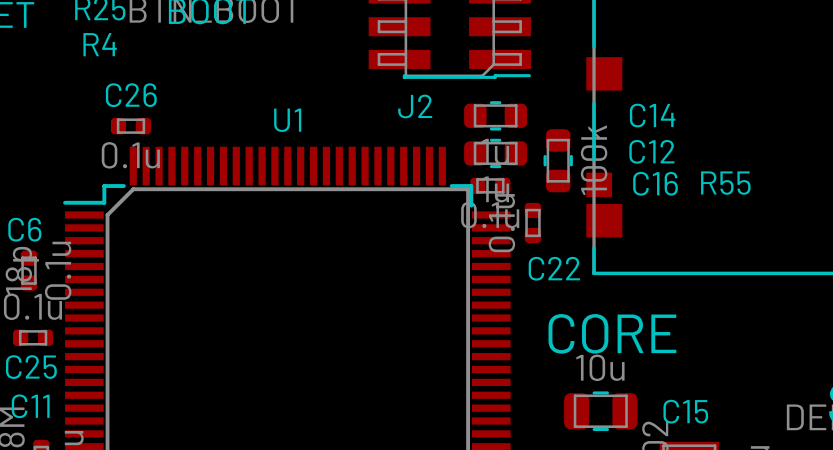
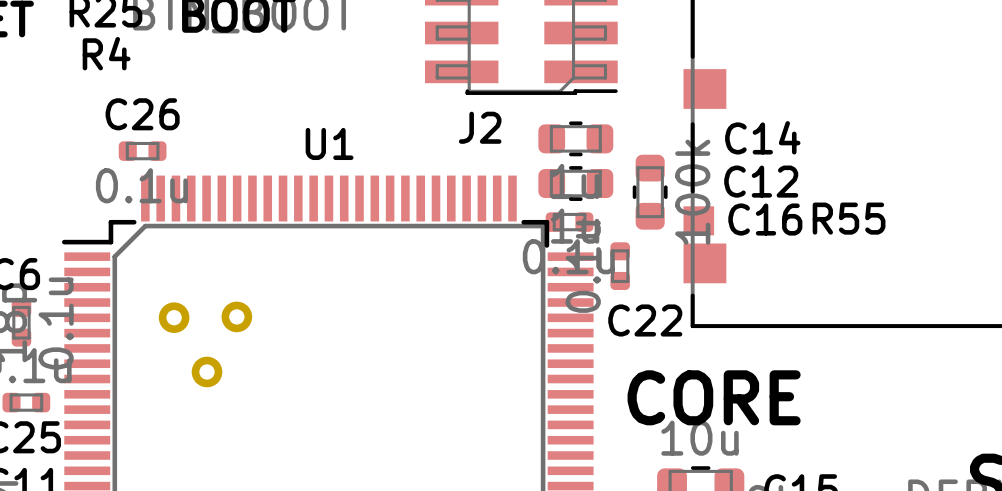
part: none -> (236, 316)
part: none -> (174, 317)
part: none -> (207, 371)

